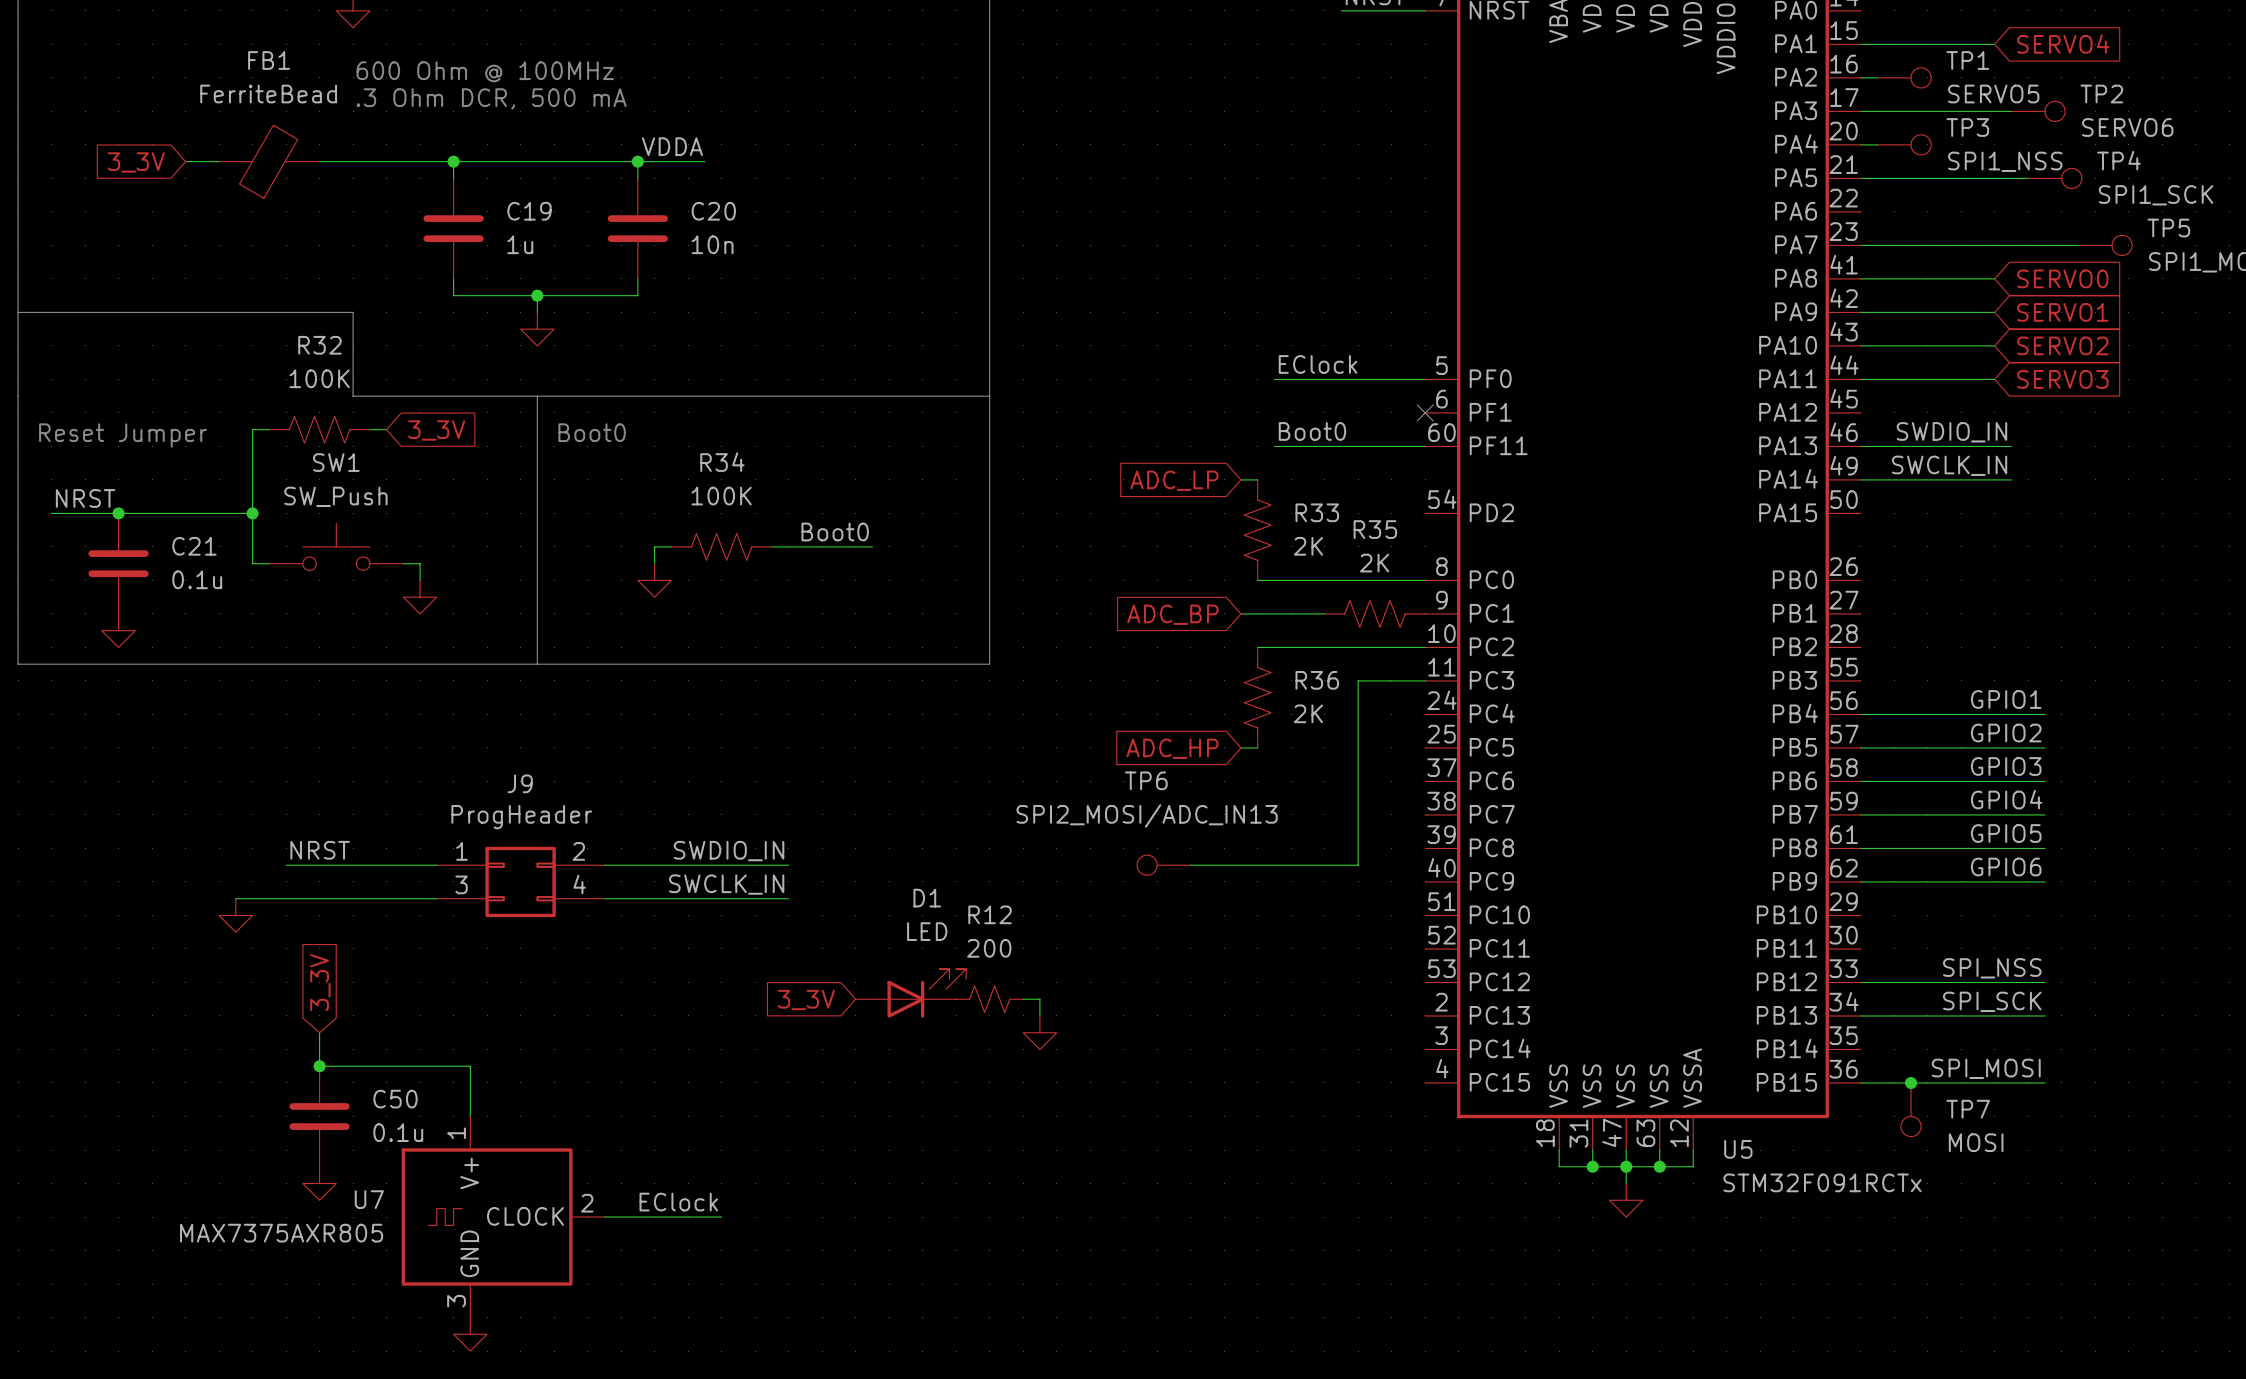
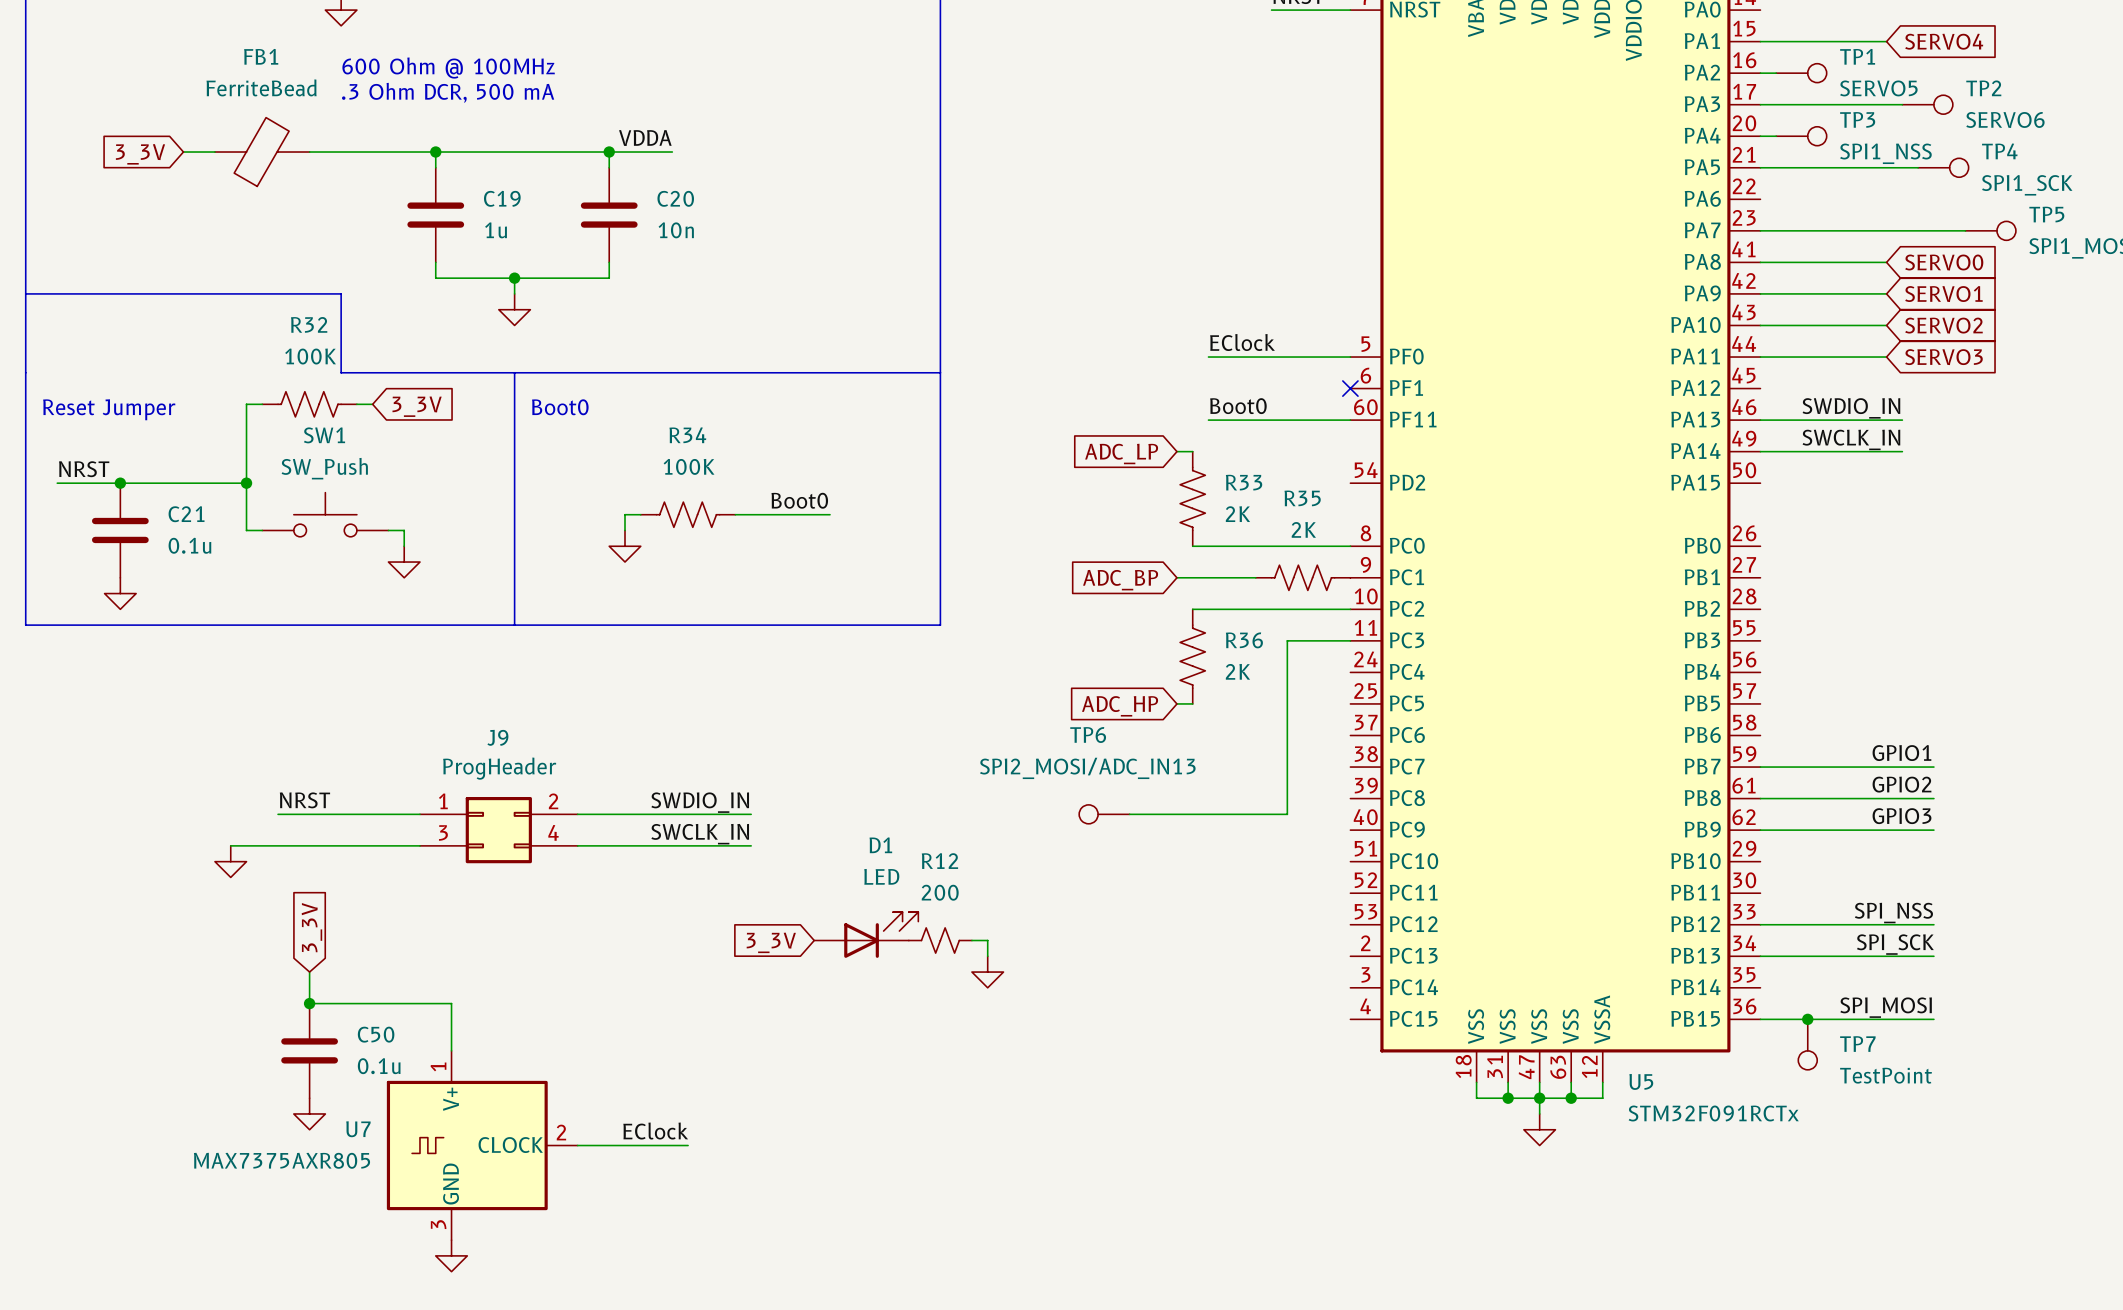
label: GPIO1 (2006, 699) -> none
wire: (1860, 714) (2045, 714) -> none
label: GPIO2 (2006, 733) -> none
wire: (1860, 747) (2045, 747) -> none
label: GPIO3 (2006, 766) -> none
wire: (1860, 781) (2045, 781) -> none
label: GPIO4 (2006, 799) -> GPIO1 (1901, 753)
label: GPIO5 (2006, 833) -> GPIO2 (1901, 784)
label: GPIO6 (2006, 867) -> GPIO3 (1901, 816)
TP7 value: MOSI (1976, 1142) -> TestPoint (1886, 1075)

